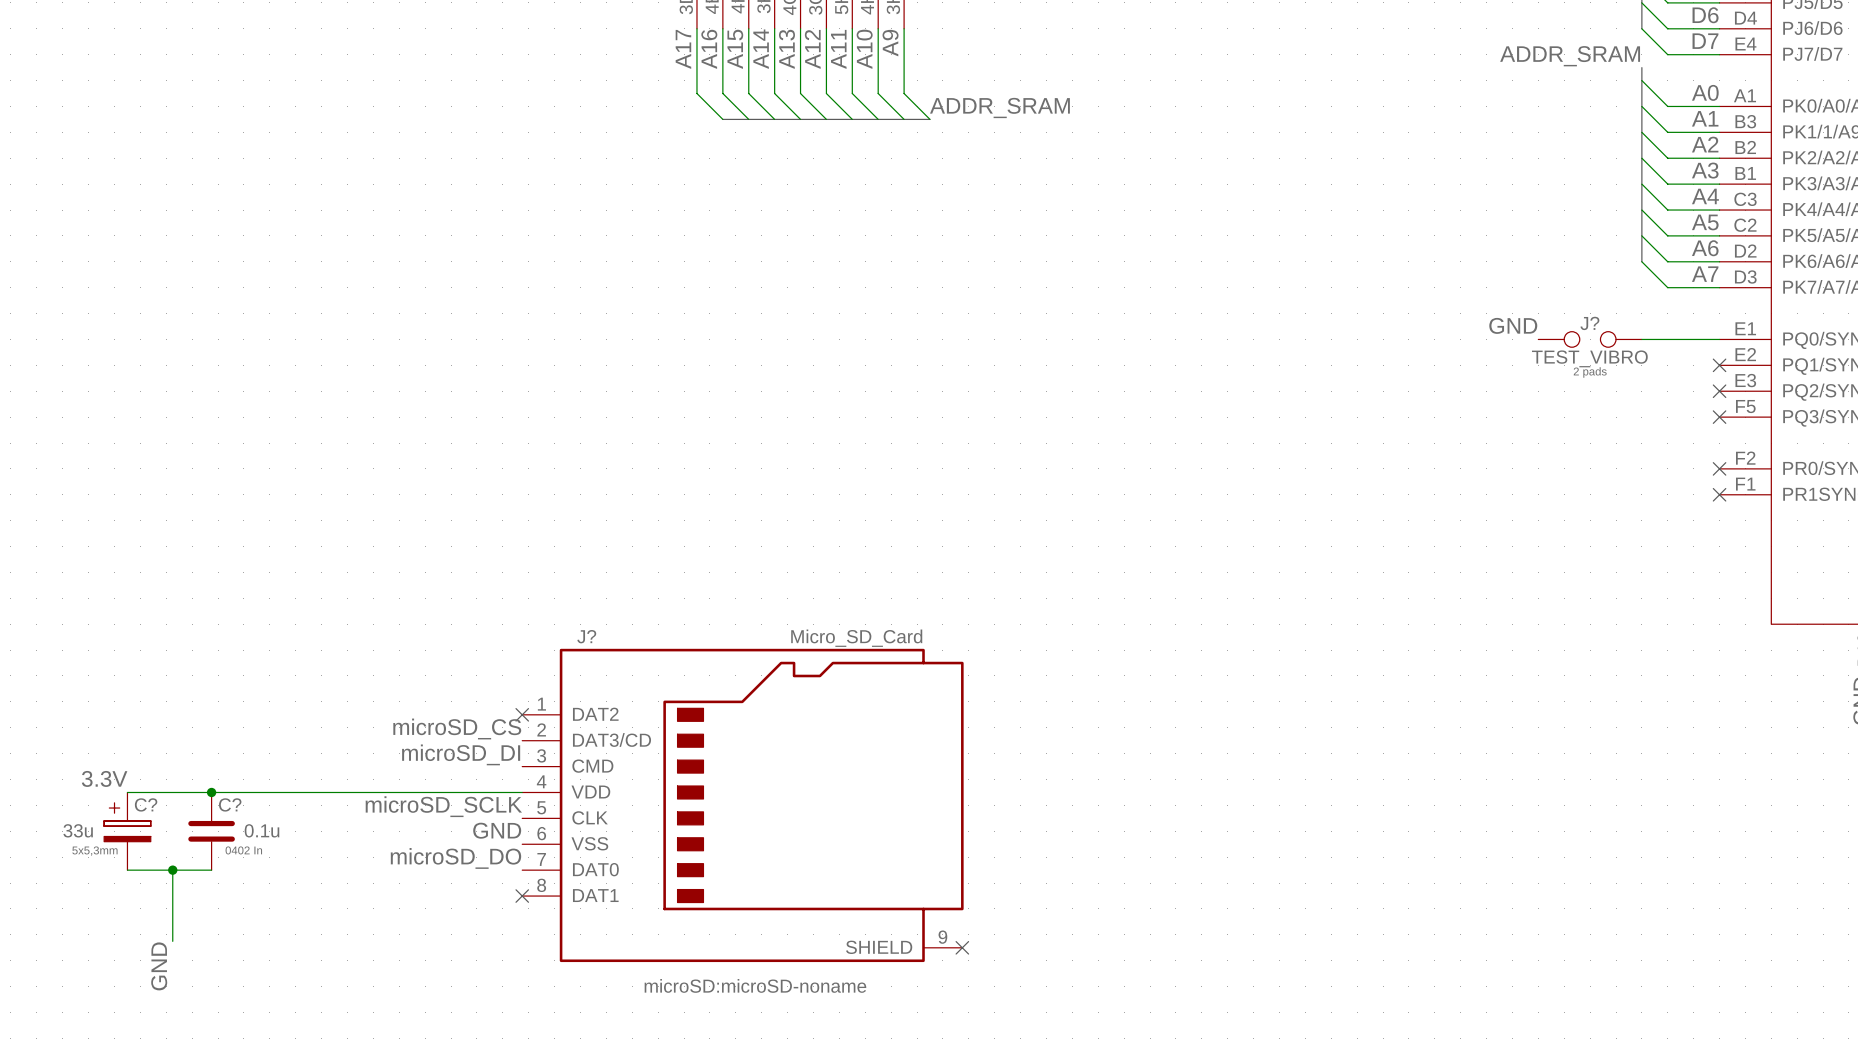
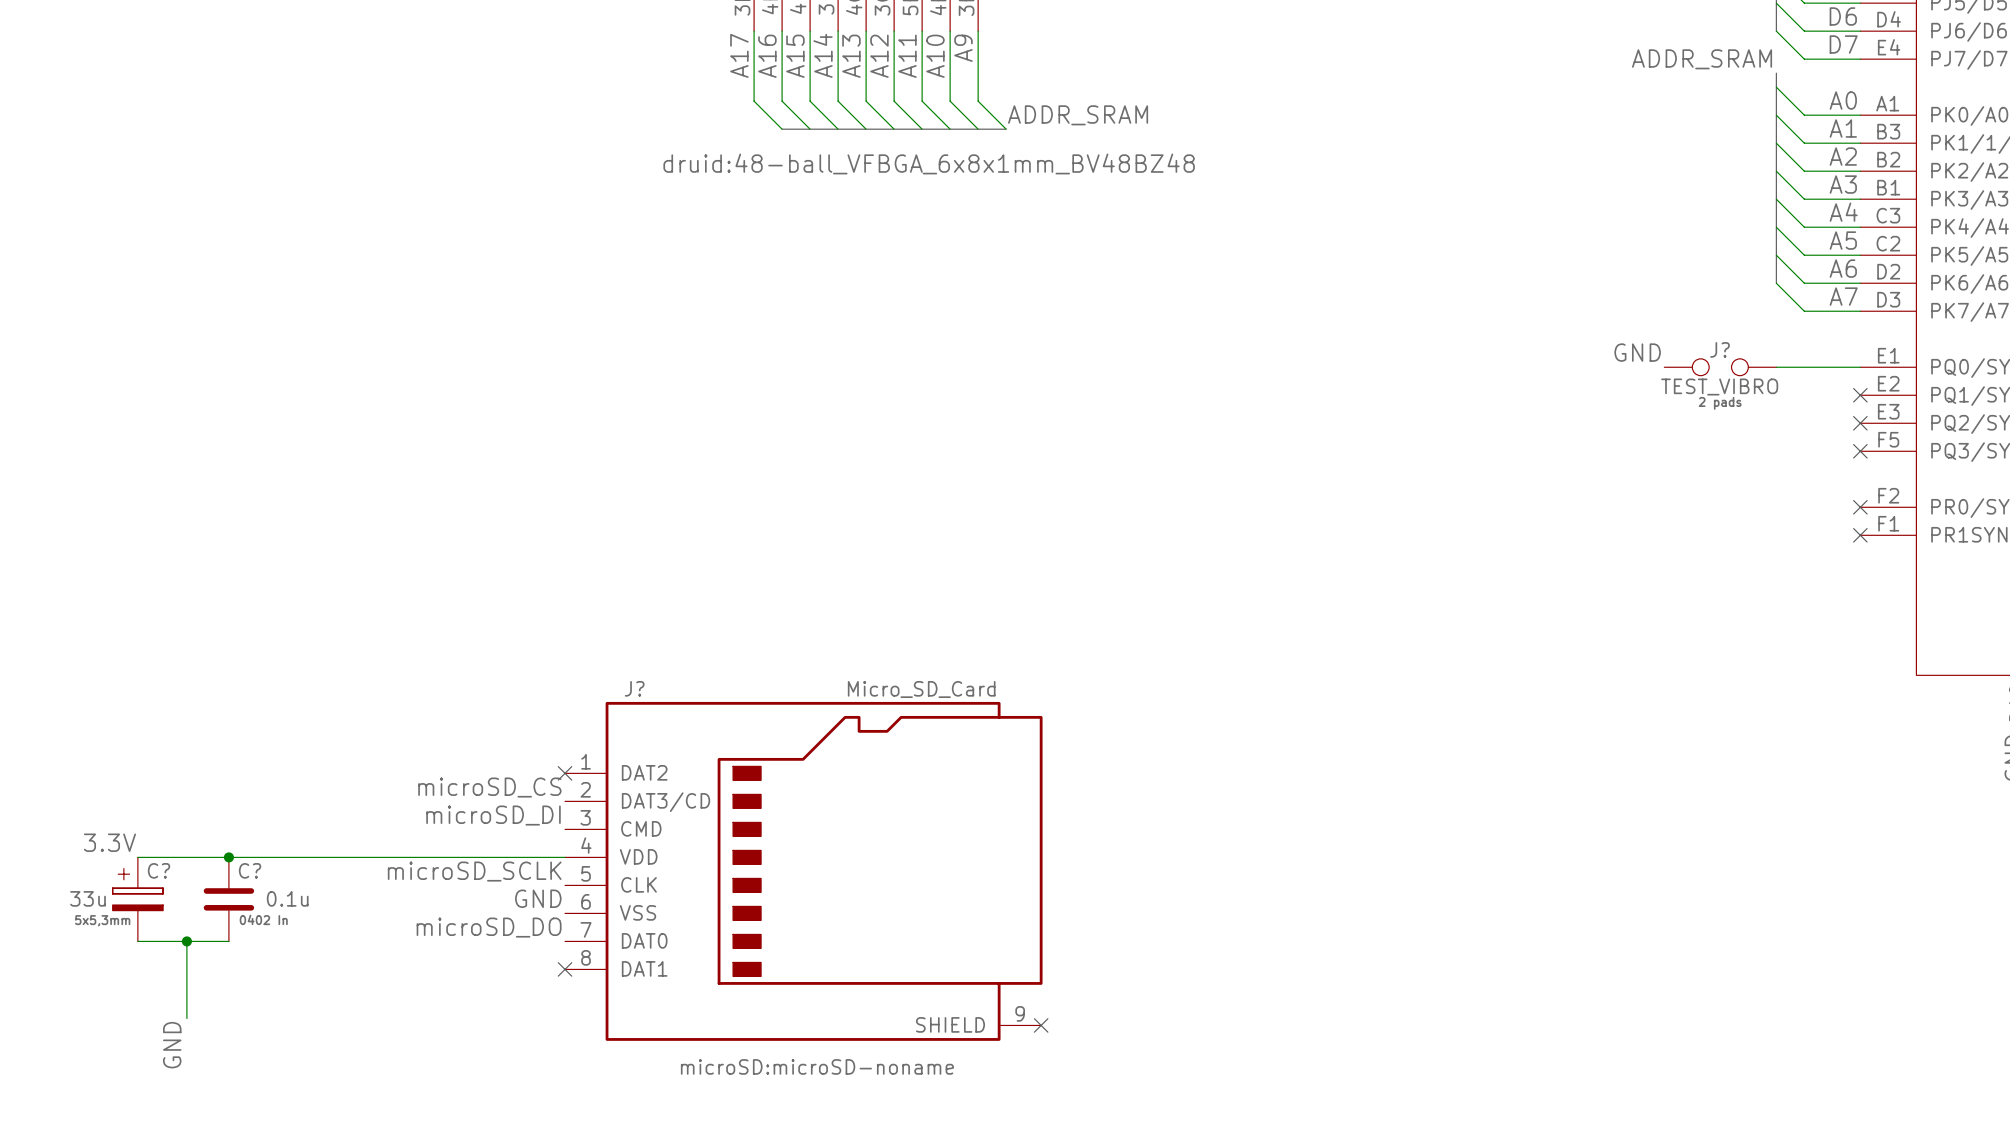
part text: none -> druid:48-ball_VFBGA_6x8x1mm_BV48BZ48 (929, 163)

